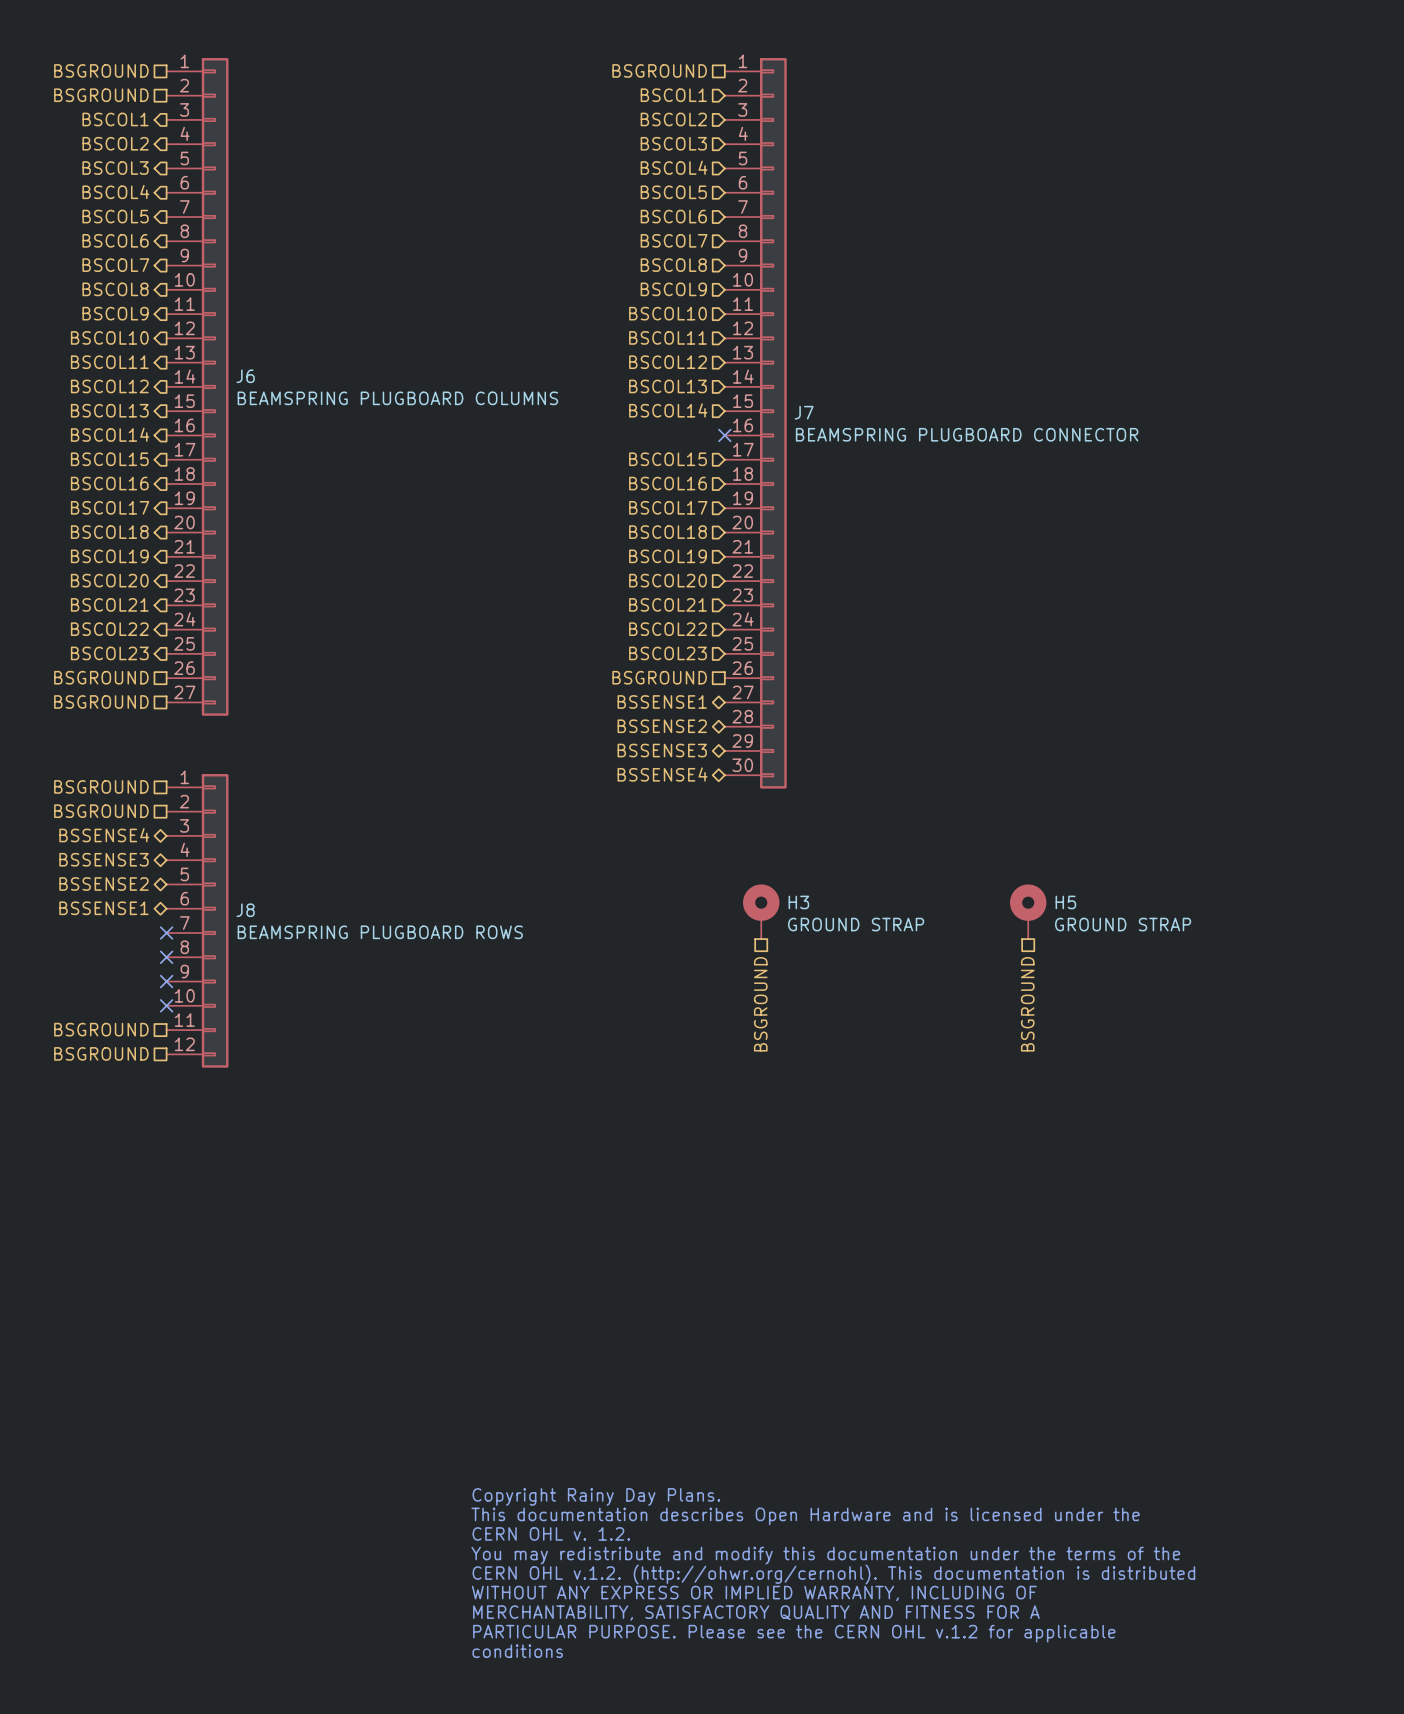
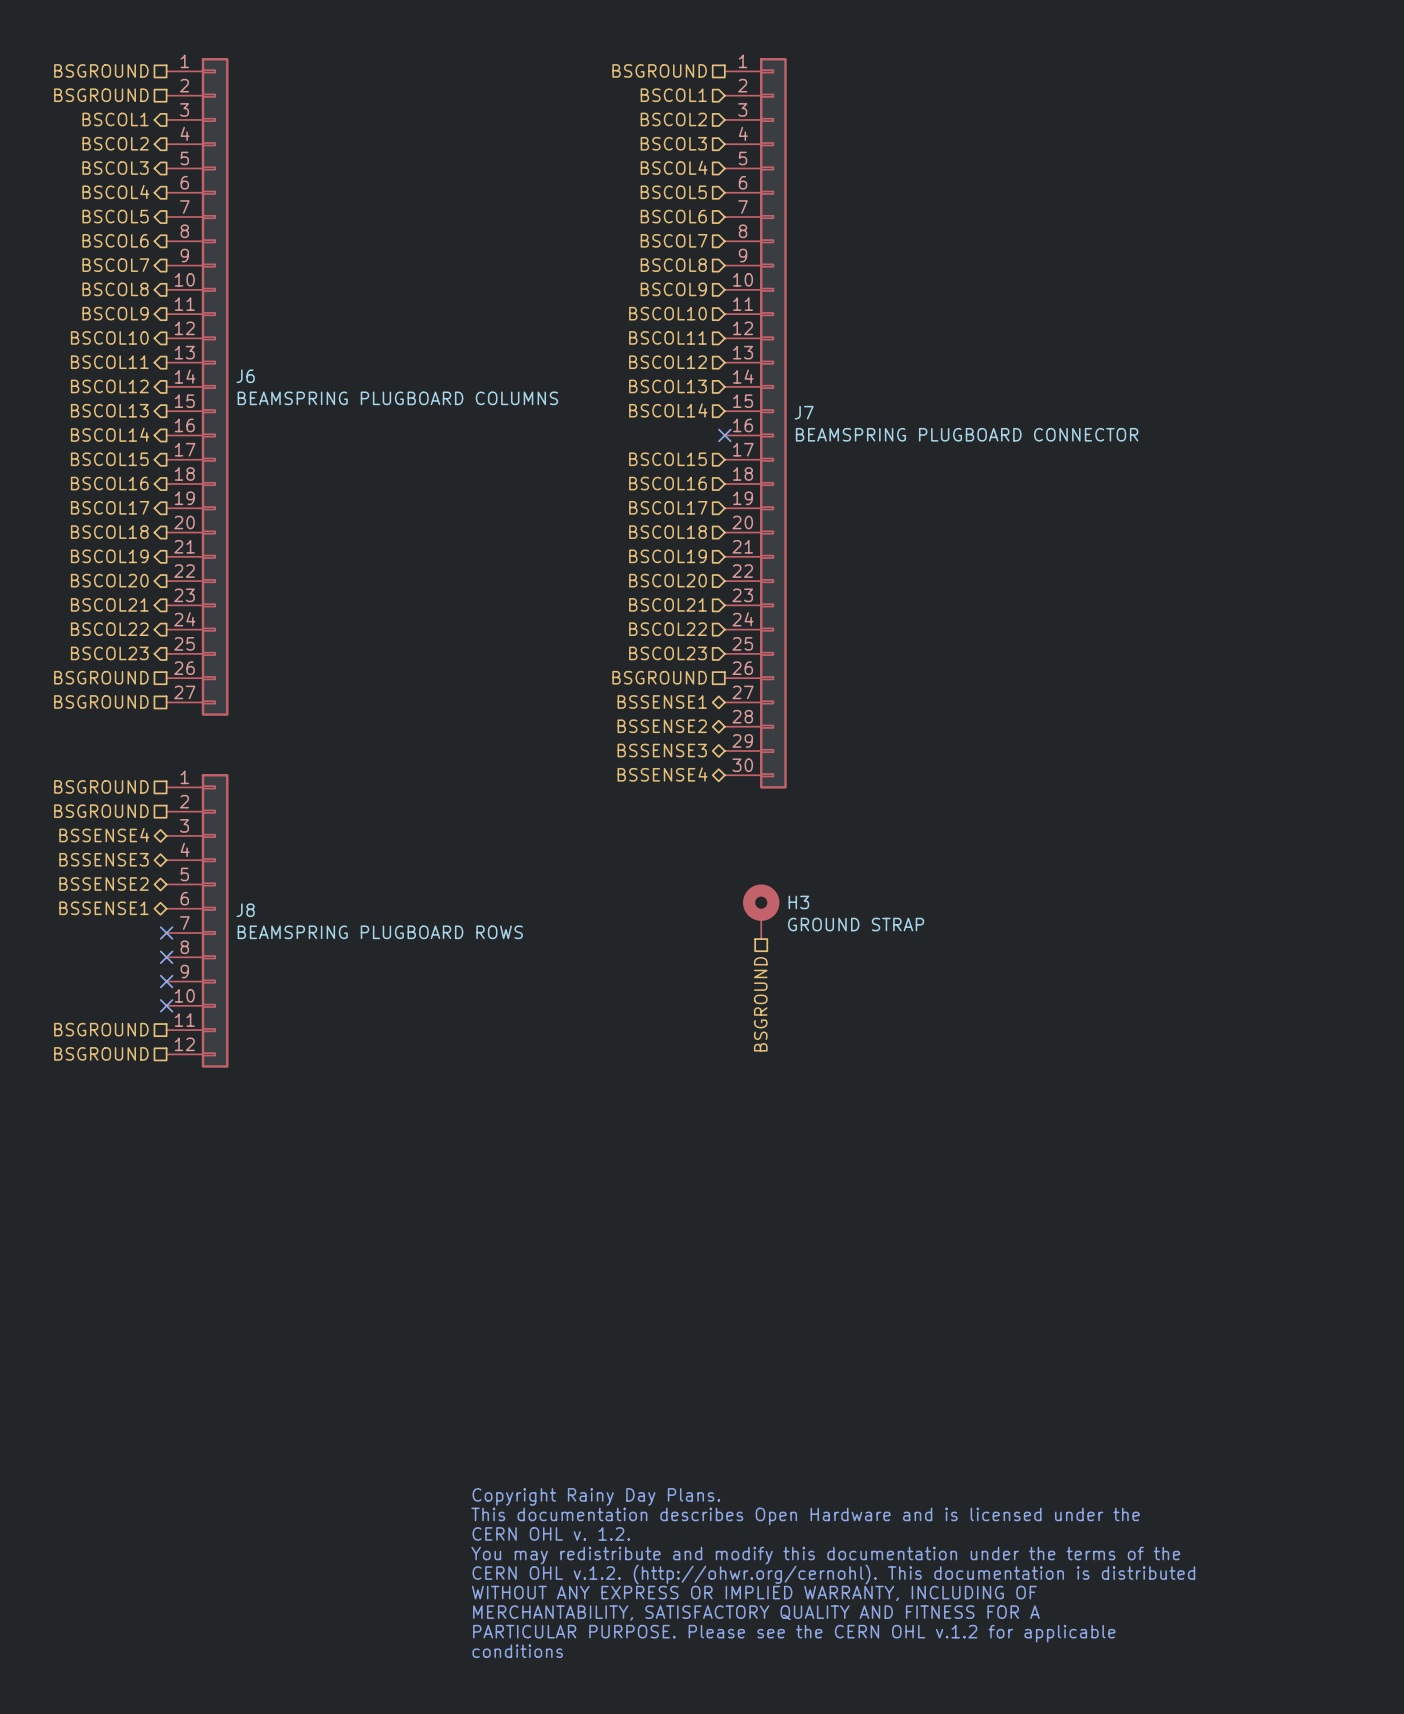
H5: GROUND STRAP (1028, 911) -> none
hierarchical label: BSGROUND (1027, 1004) -> none

